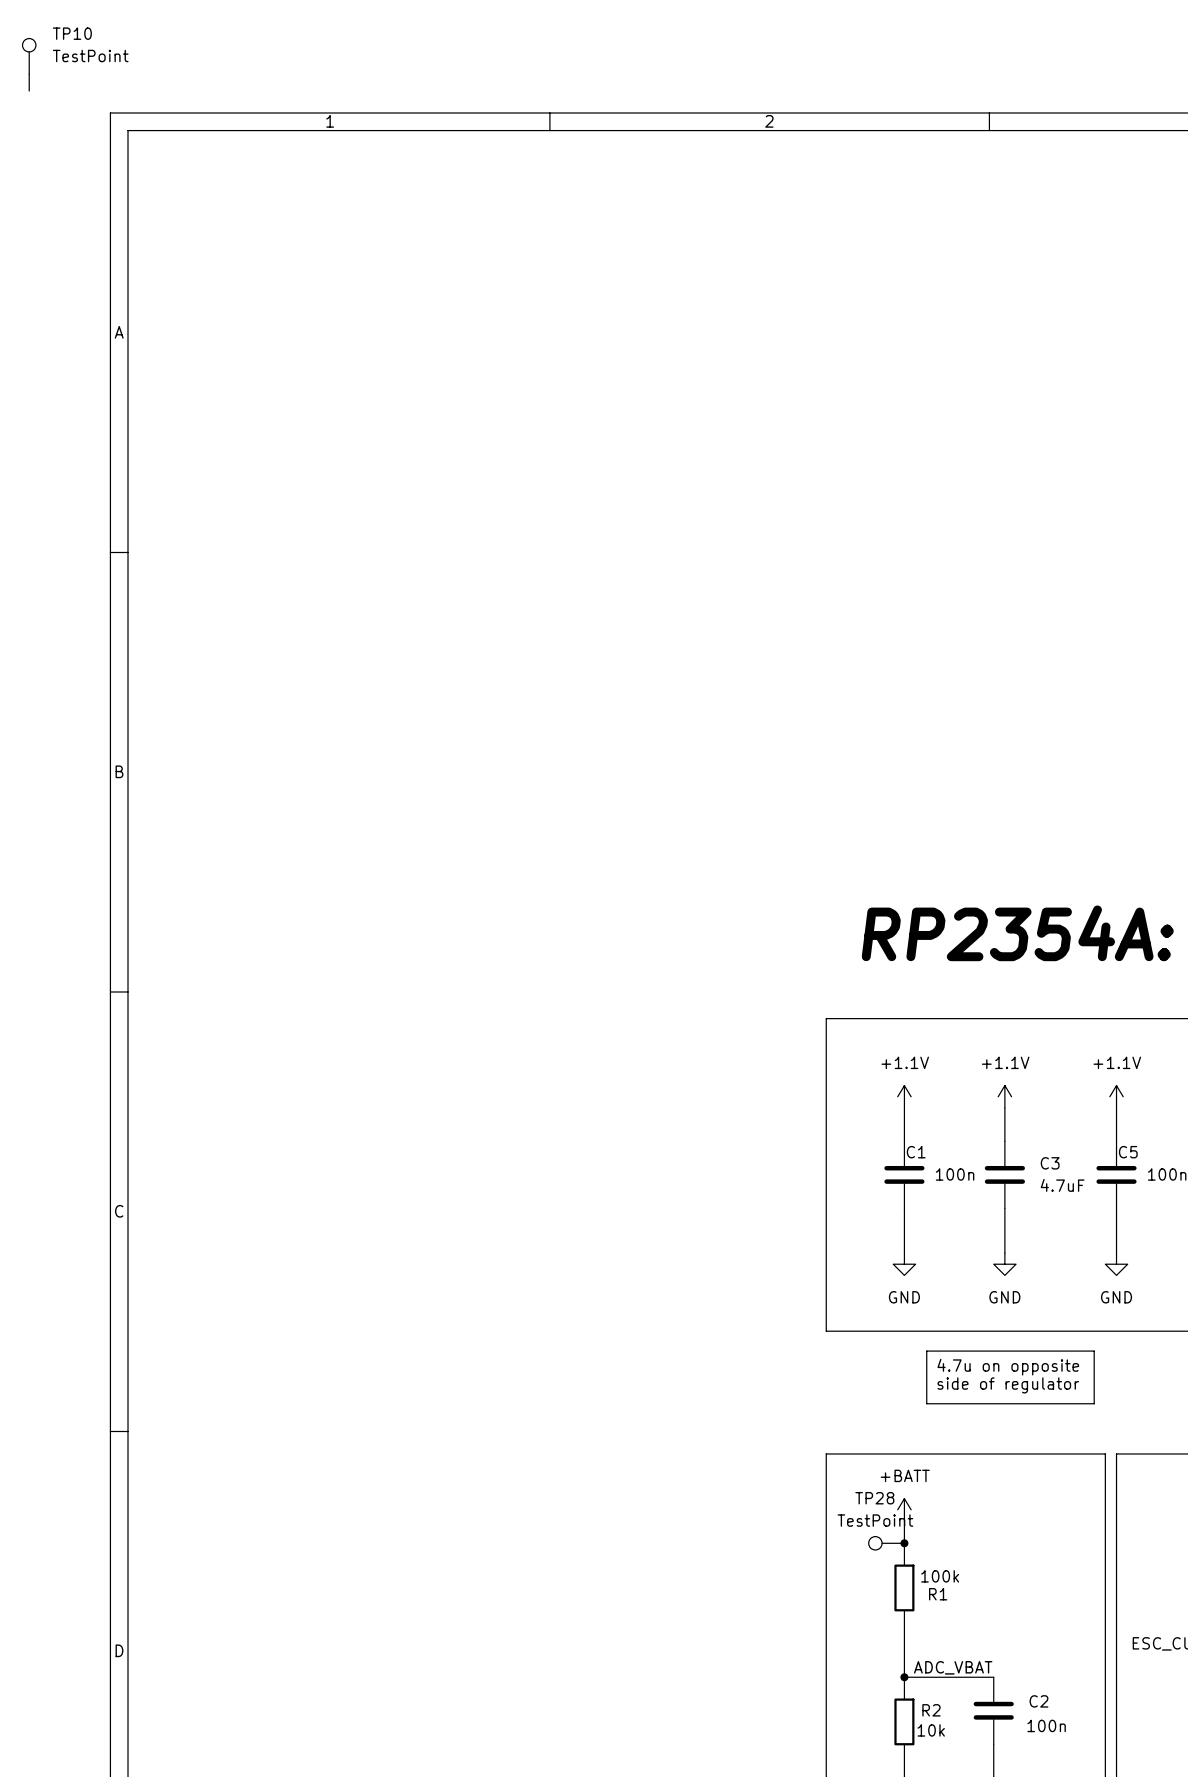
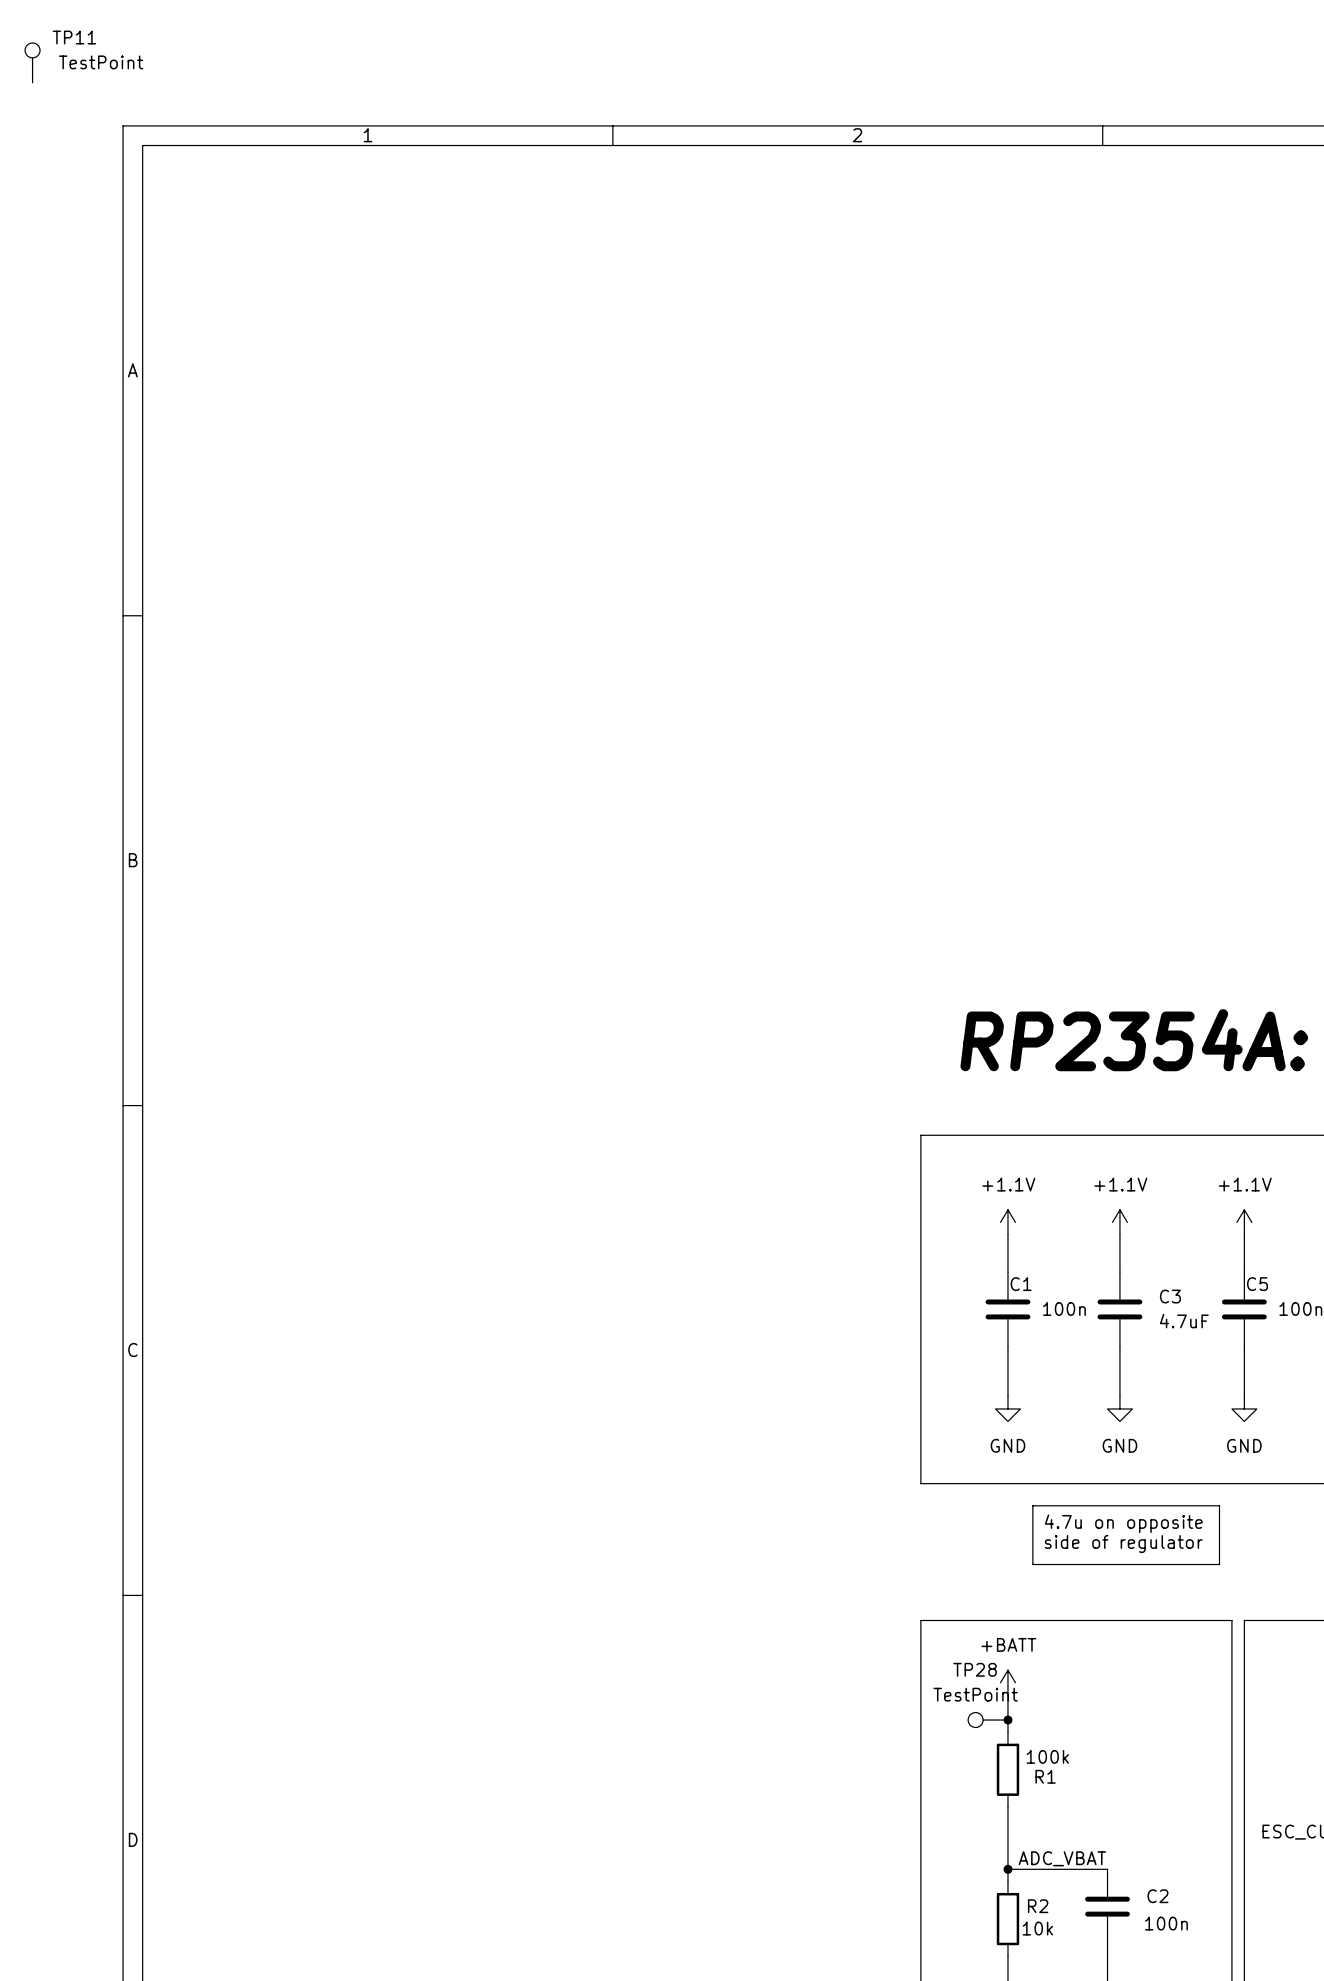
TP10 name: TP10 (72, 33) -> TP11 (74, 37)
wire: (29, 74) (29, 91) -> none

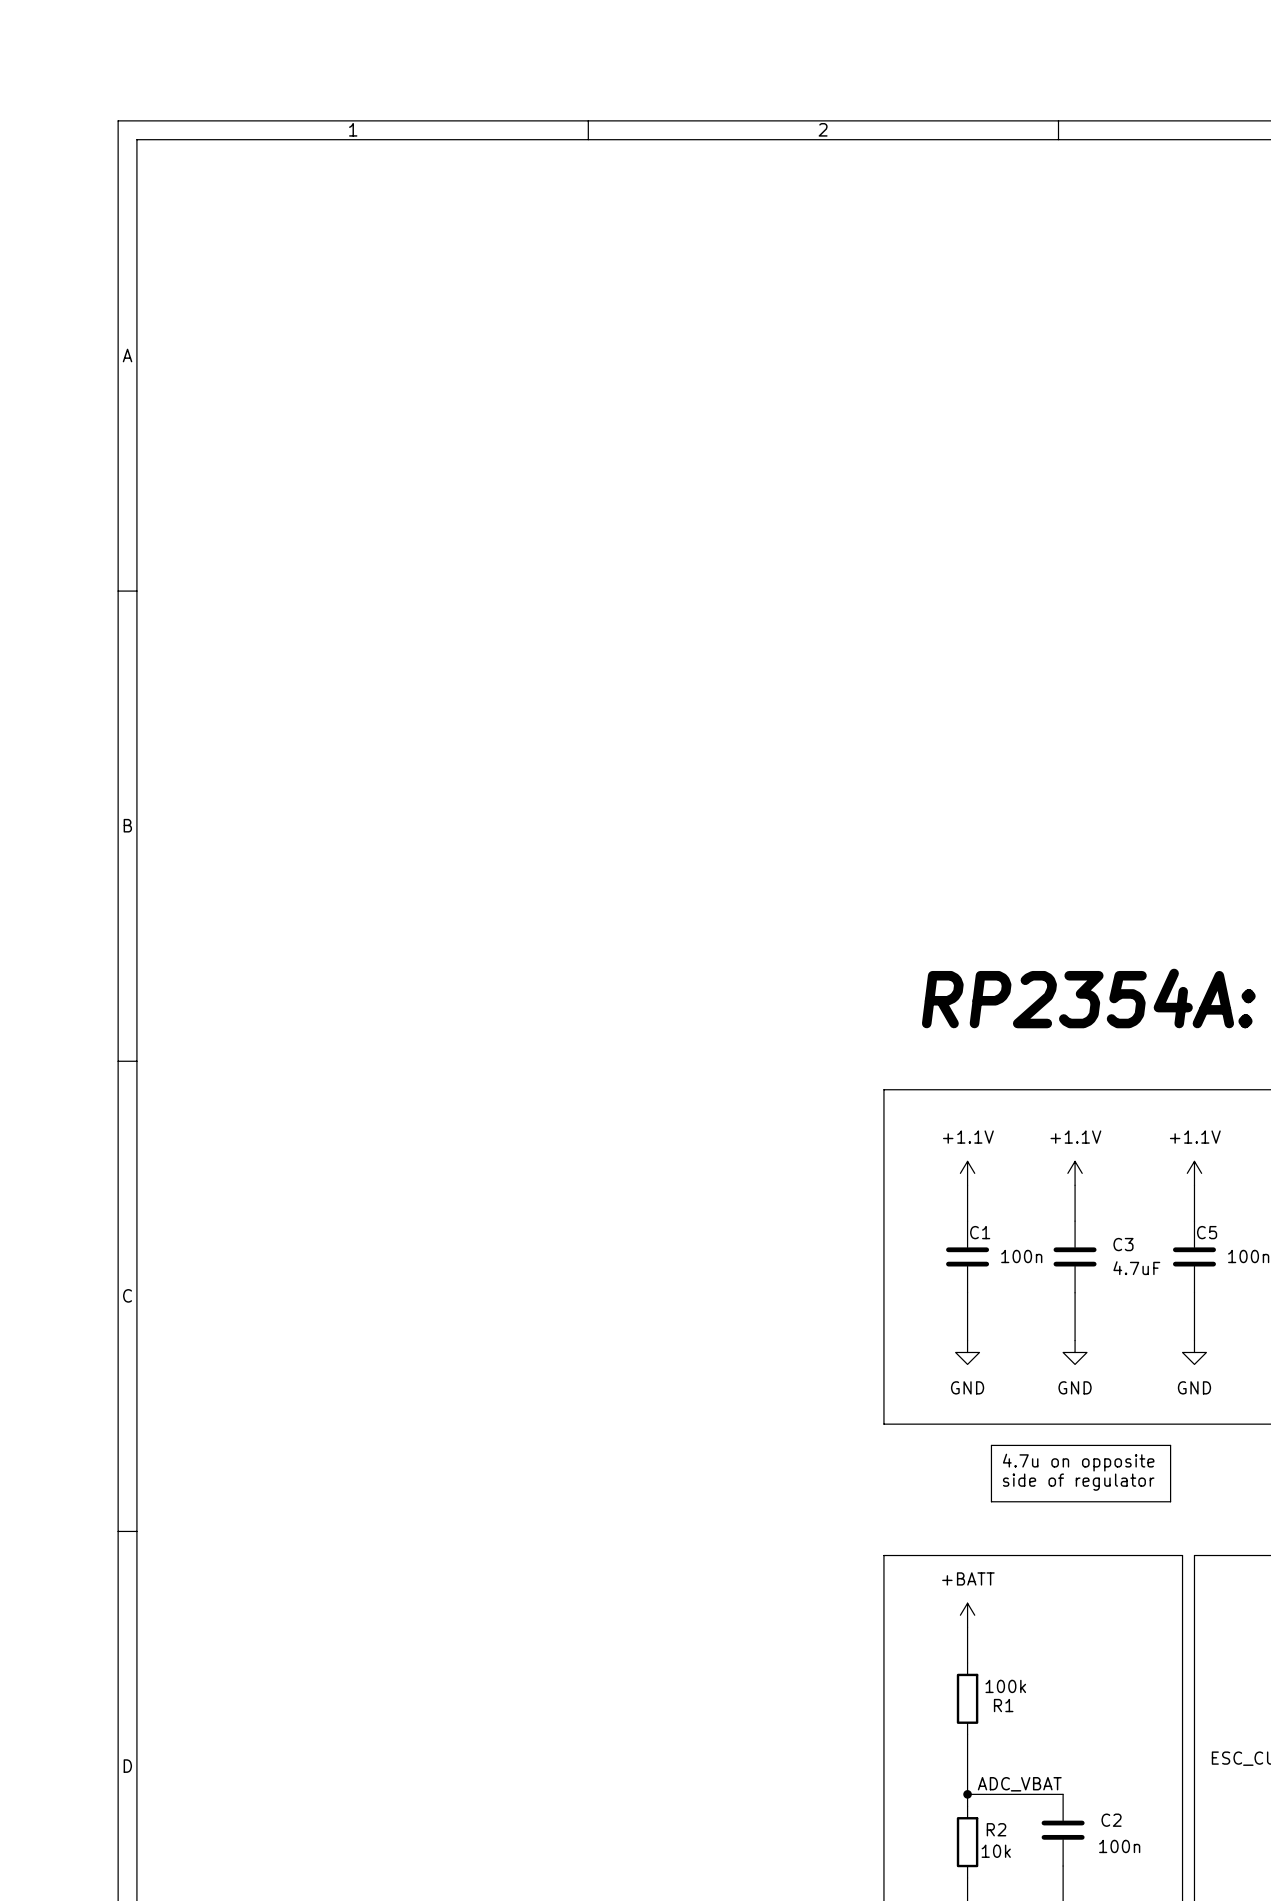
TP11: TestPoint (32, 62) -> none
TP28: TestPoint (988, 1720) -> none
junction: (1007, 1720) -> none

